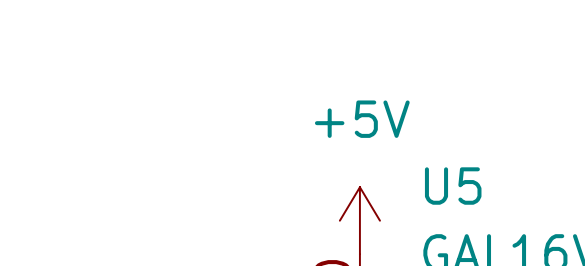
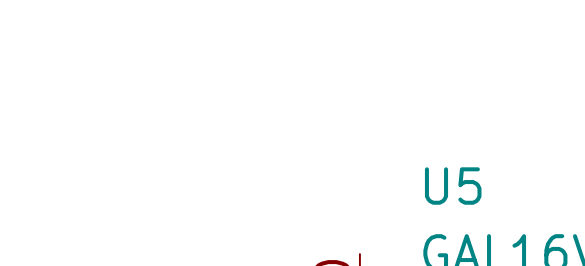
power symbol: +5V (359, 220) -> none

